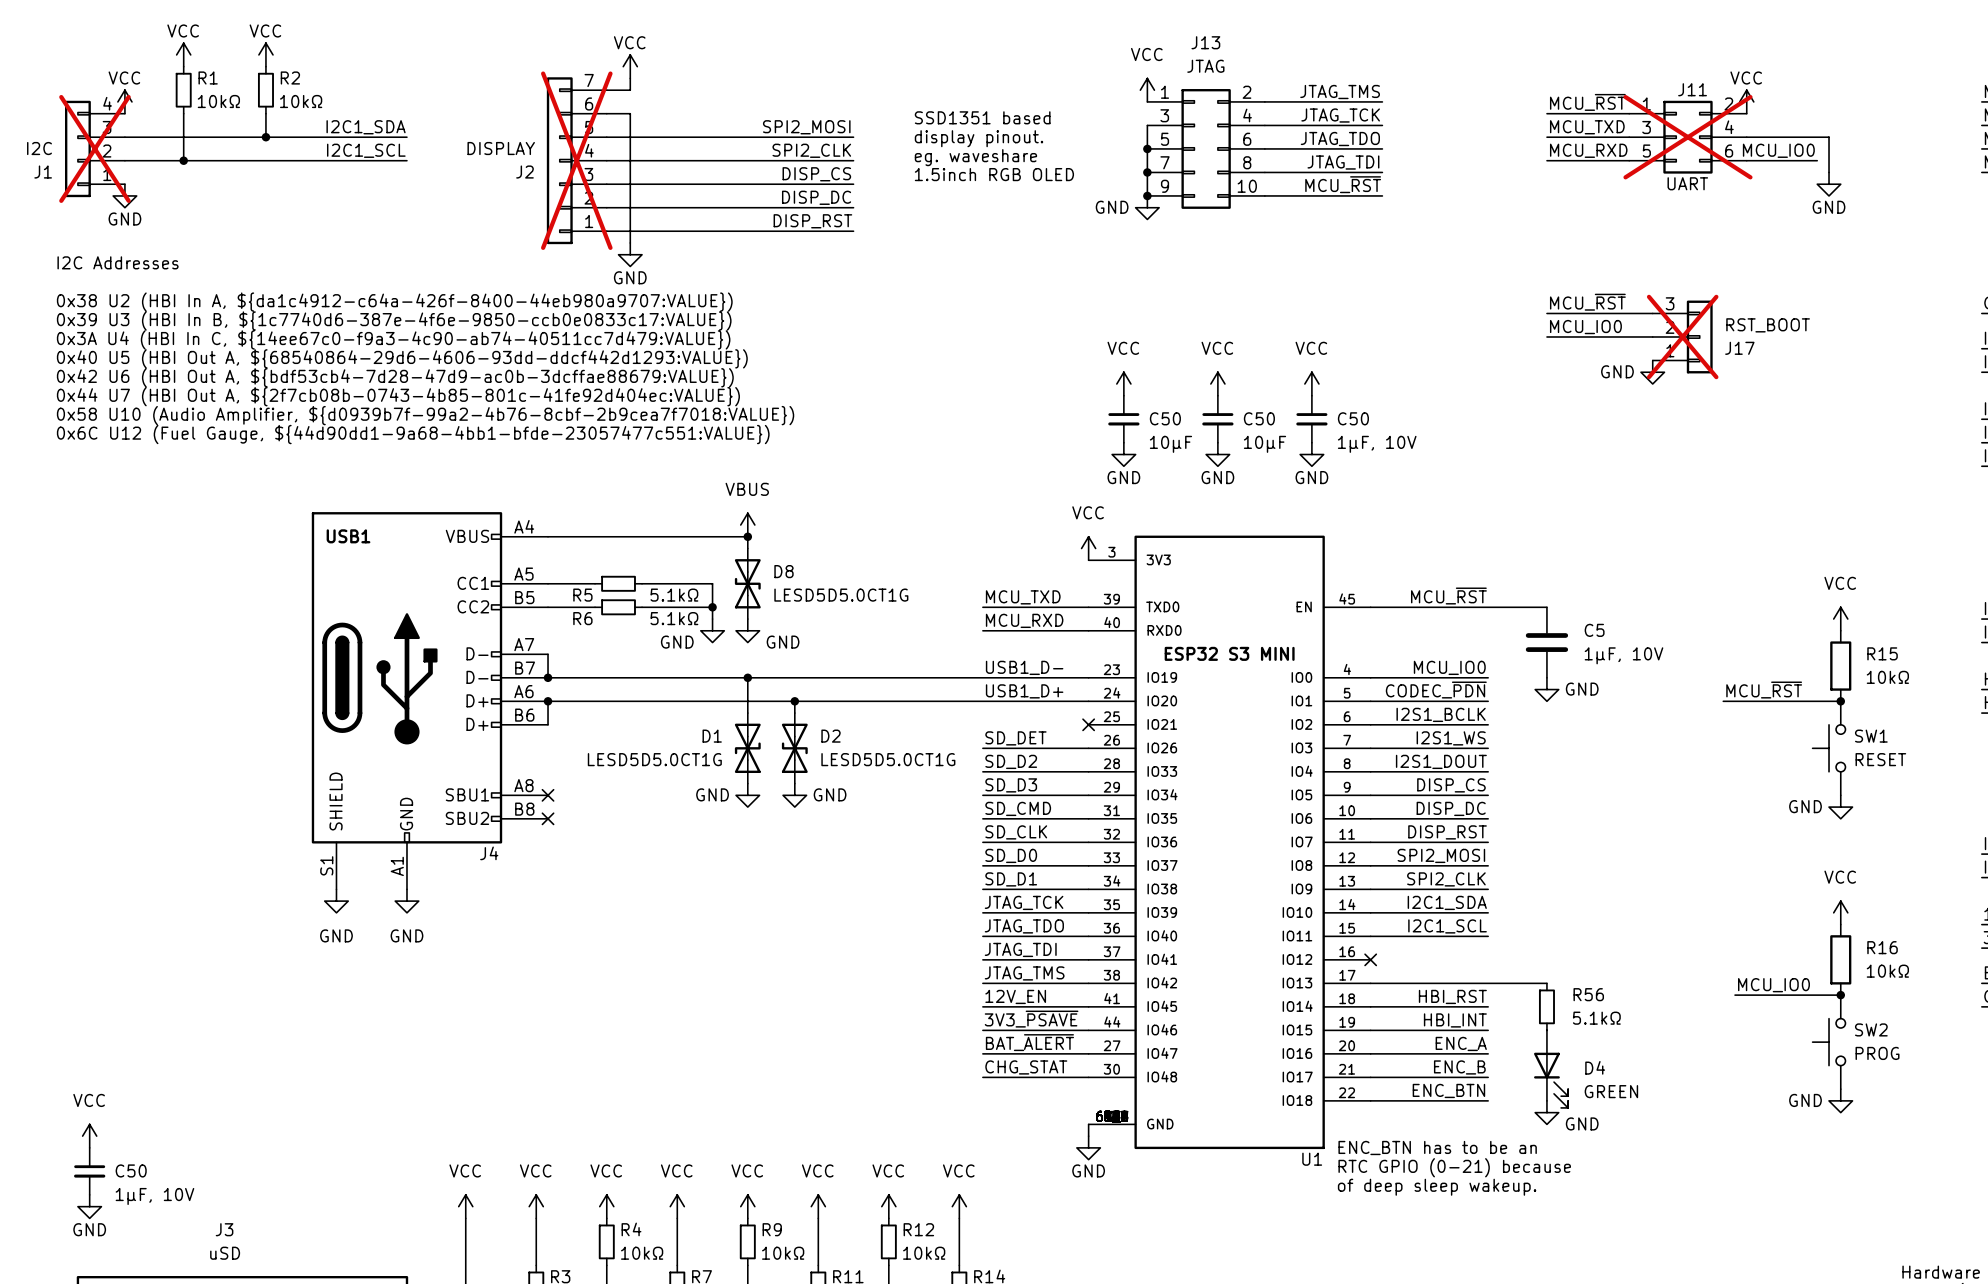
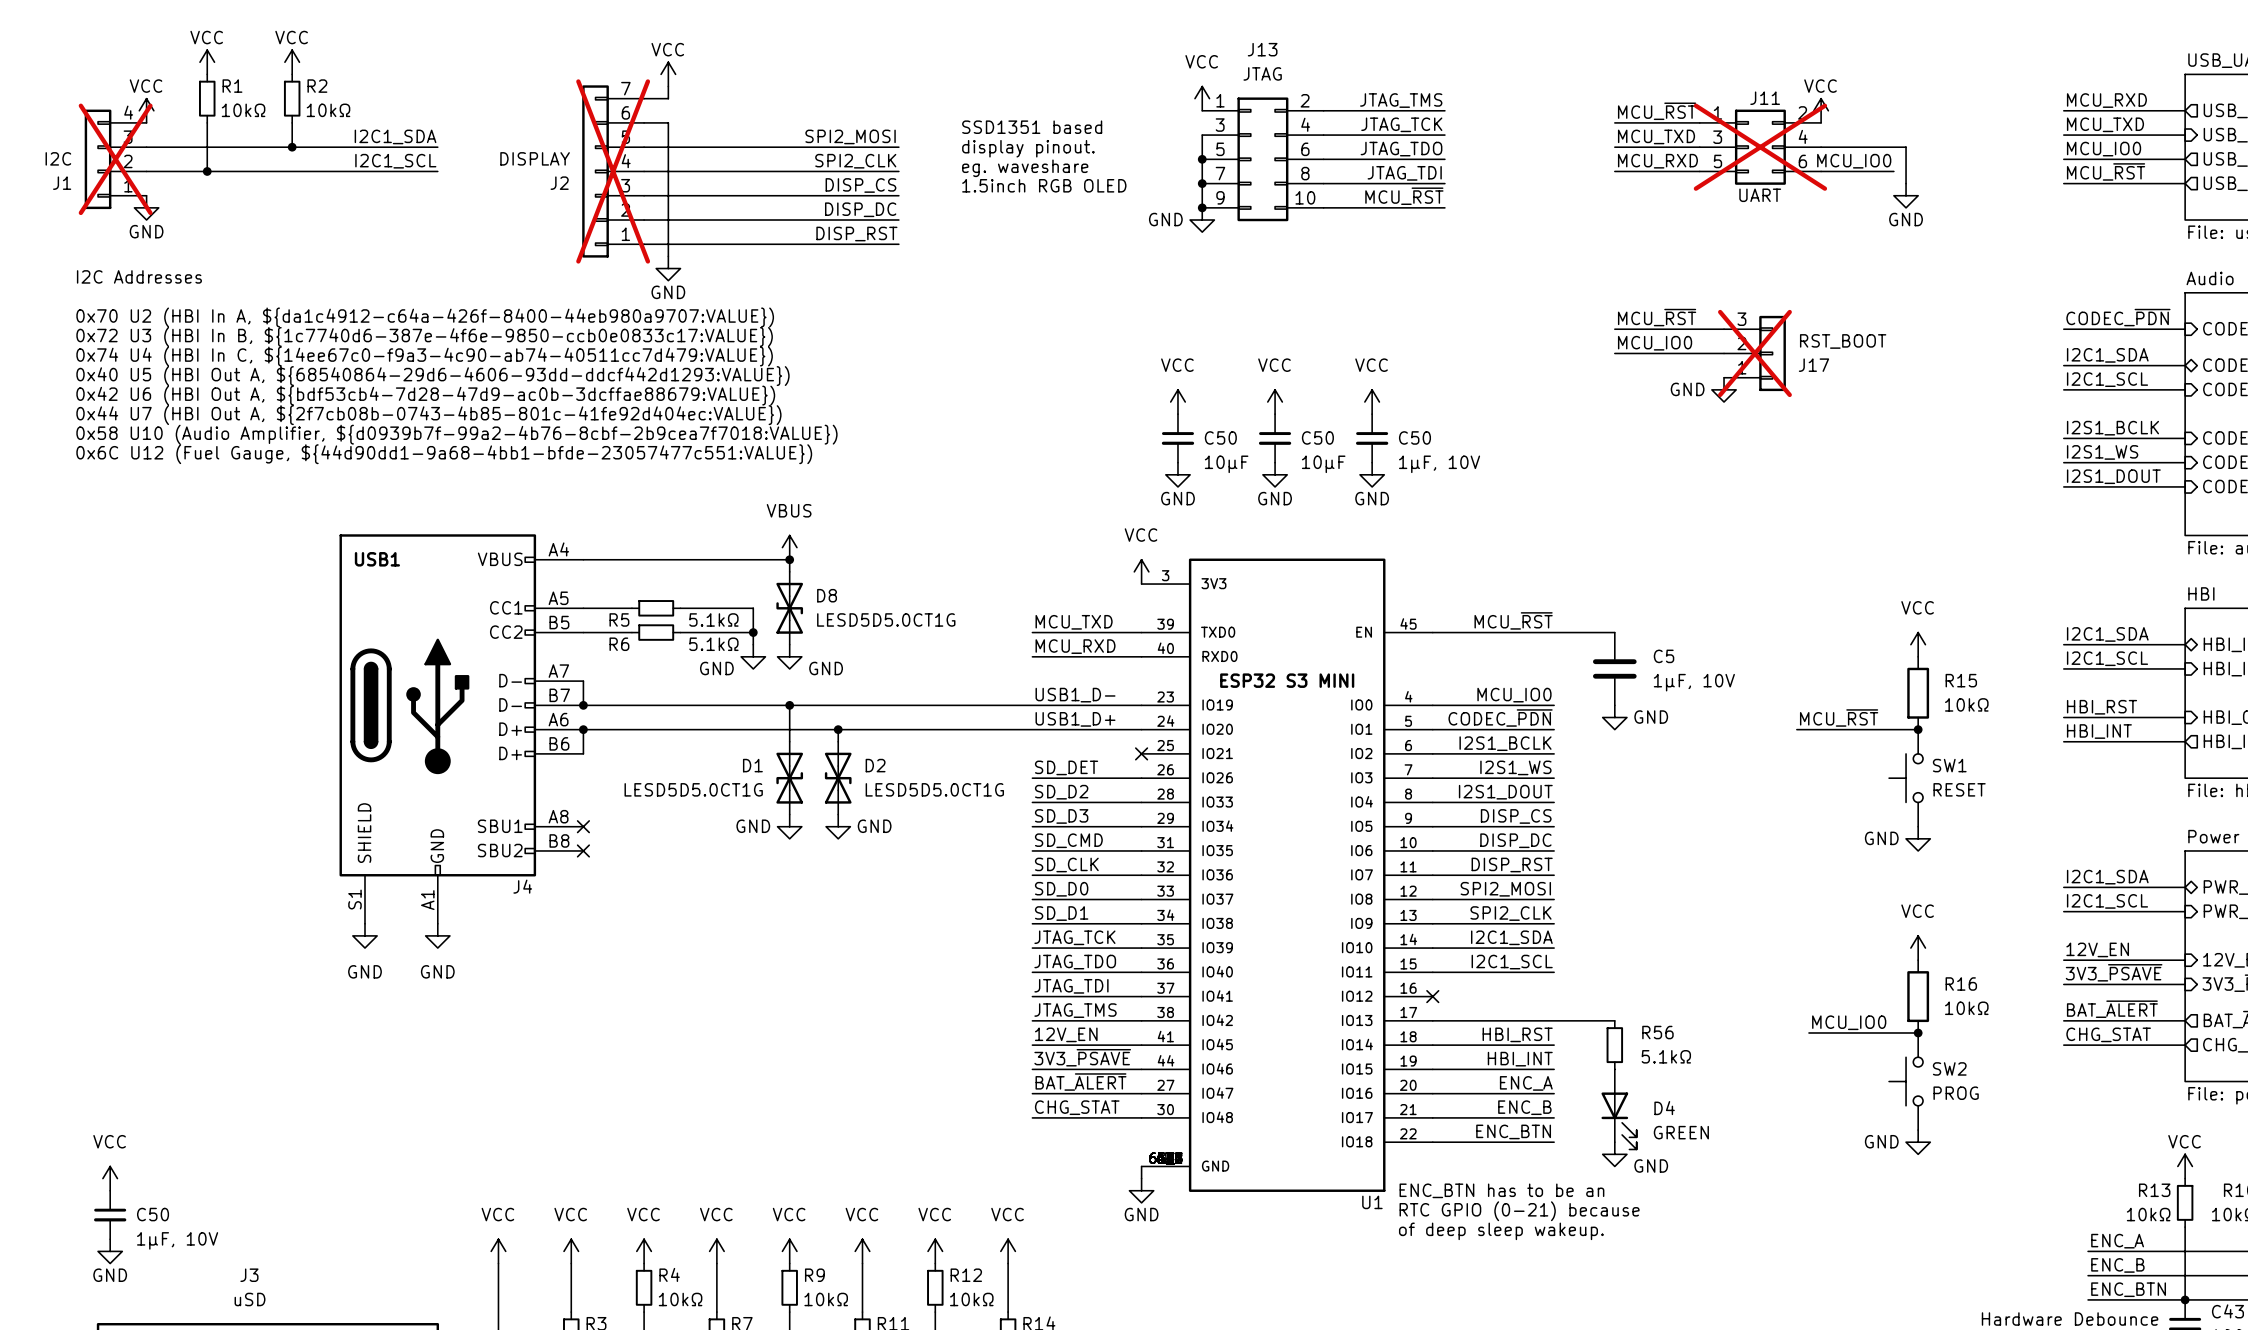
text: 0x38 U2 (HBI In A, ${da1c4912-c64a-426f-8400-44eb980a9707:VALUE}) (394, 302) -> 0x70 U2 (HBI In A, ${da1c4912-c64a-426f-8400-44eb980a9707:VALUE}) (425, 317)
text: 0x39 U3 (HBI In B, ${1c7740d6-387e-4f6e-9850-ccb0e0833c17:VALUE}) (394, 321) -> 0x72 U3 (HBI In B, ${1c7740d6-387e-4f6e-9850-ccb0e0833c17:VALUE}) (424, 336)
text: 0x3A U4 (HBI In C, ${14ee67c0-f9a3-4c90-ab74-40511cc7d479:VALUE}) (393, 339) -> 0x74 U4 (HBI In C, ${14ee67c0-f9a3-4c90-ab74-40511cc7d479:VALUE}) (424, 356)

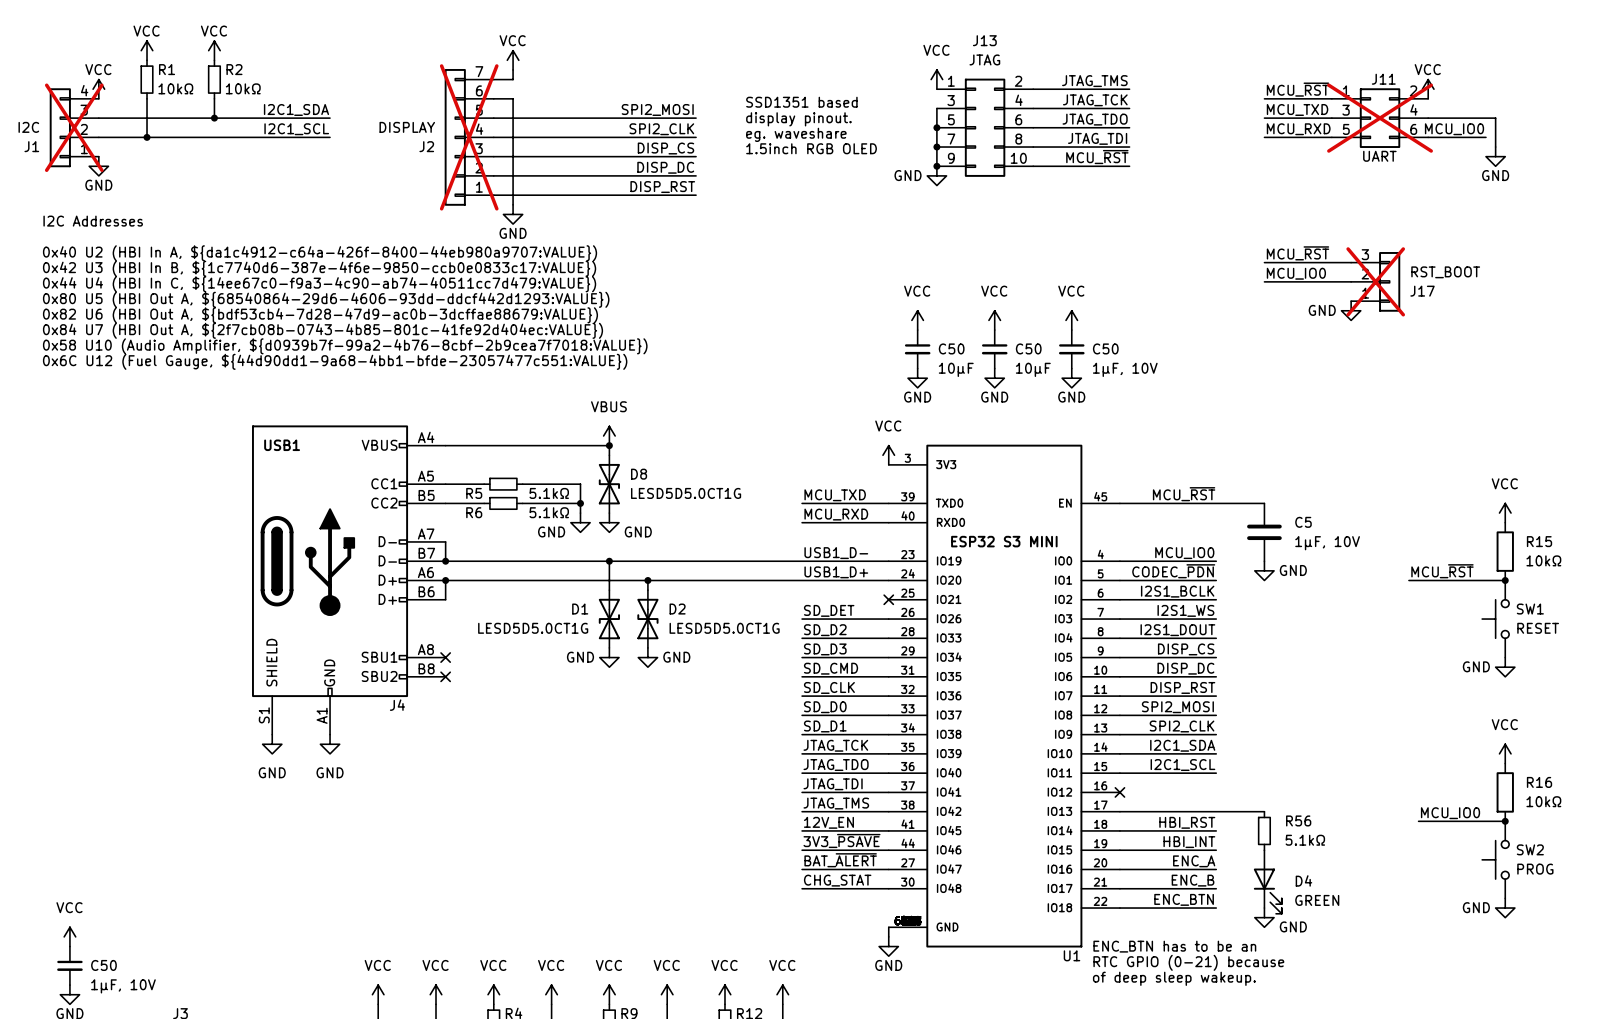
text: 0x70 U2 (HBI In A, ${da1c4912-c64a-426f-8400-44eb980a9707:VALUE}) (425, 317) -> 0x40 U2 (HBI In A, ${da1c4912-c64a-426f-8400-44eb980a9707:VALUE}) (320, 253)
text: 0x72 U3 (HBI In B, ${1c7740d6-387e-4f6e-9850-ccb0e0833c17:VALUE}) (424, 336) -> 0x42 U3 (HBI In B, ${1c7740d6-387e-4f6e-9850-ccb0e0833c17:VALUE}) (319, 268)
text: 0x74 U4 (HBI In C, ${14ee67c0-f9a3-4c90-ab74-40511cc7d479:VALUE}) (424, 356) -> 0x44 U4 (HBI In C, ${14ee67c0-f9a3-4c90-ab74-40511cc7d479:VALUE}) (319, 284)
text: 0x40 U5 (HBI Out A, ${68540864-29d6-4606-93dd-ddcf442d1293:VALUE}) (432, 376) -> 0x80 U5 (HBI Out A, ${68540864-29d6-4606-93dd-ddcf442d1293:VALUE}) (326, 299)
text: 0x42 U6 (HBI Out A, ${bdf53cb4-7d28-47d9-ac0b-3dcffae88679:VALUE}) (425, 395) -> 0x82 U6 (HBI Out A, ${bdf53cb4-7d28-47d9-ac0b-3dcffae88679:VALUE}) (320, 315)
text: 0x44 U7 (HBI Out A, ${2f7cb08b-0743-4b85-801c-41fe92d404ec:VALUE}) (428, 415) -> 0x84 U7 (HBI Out A, ${2f7cb08b-0743-4b85-801c-41fe92d404ec:VALUE}) (323, 330)

